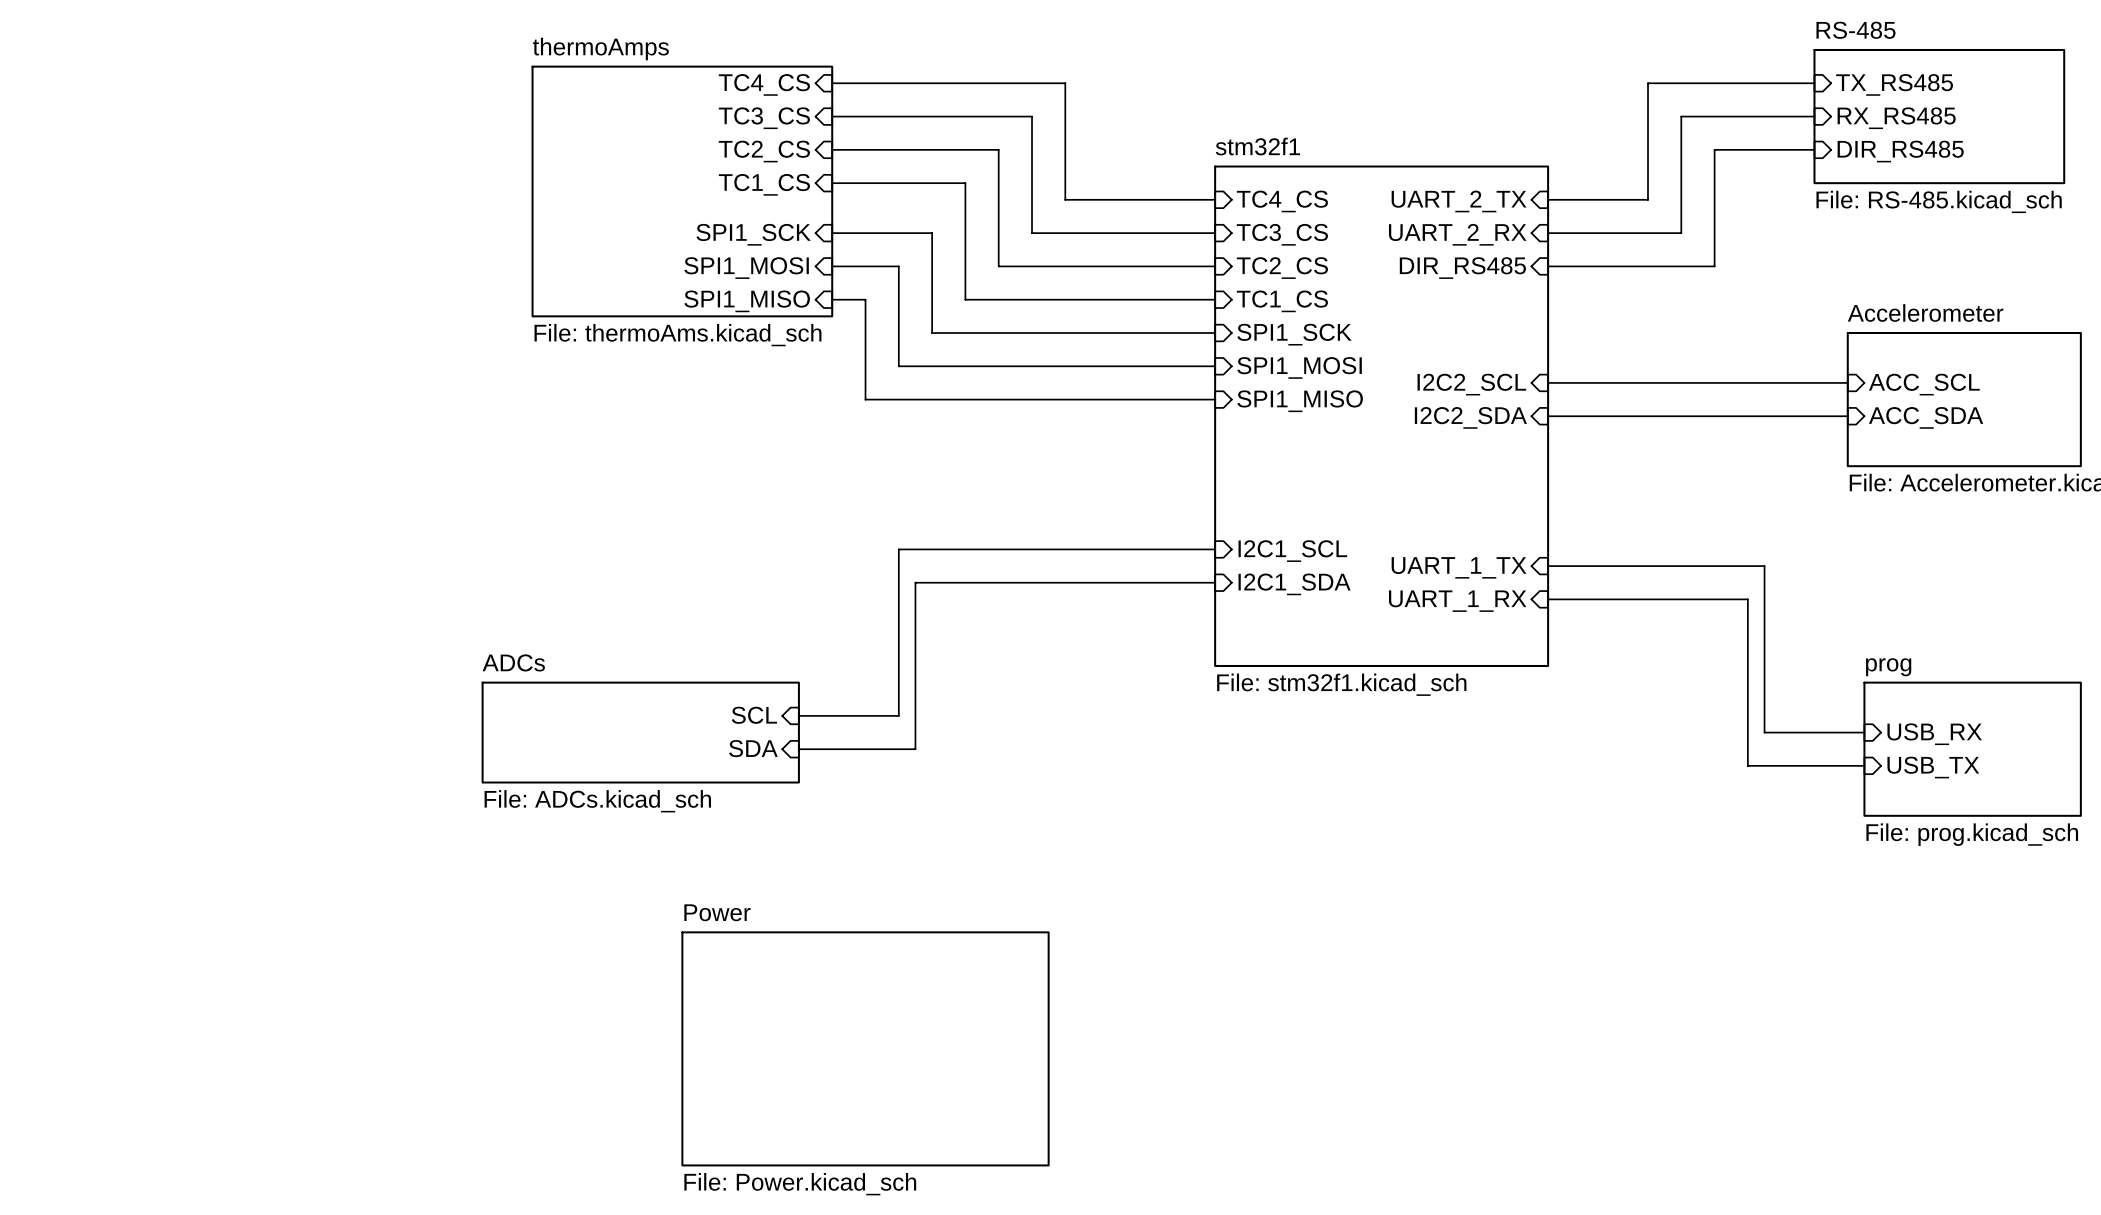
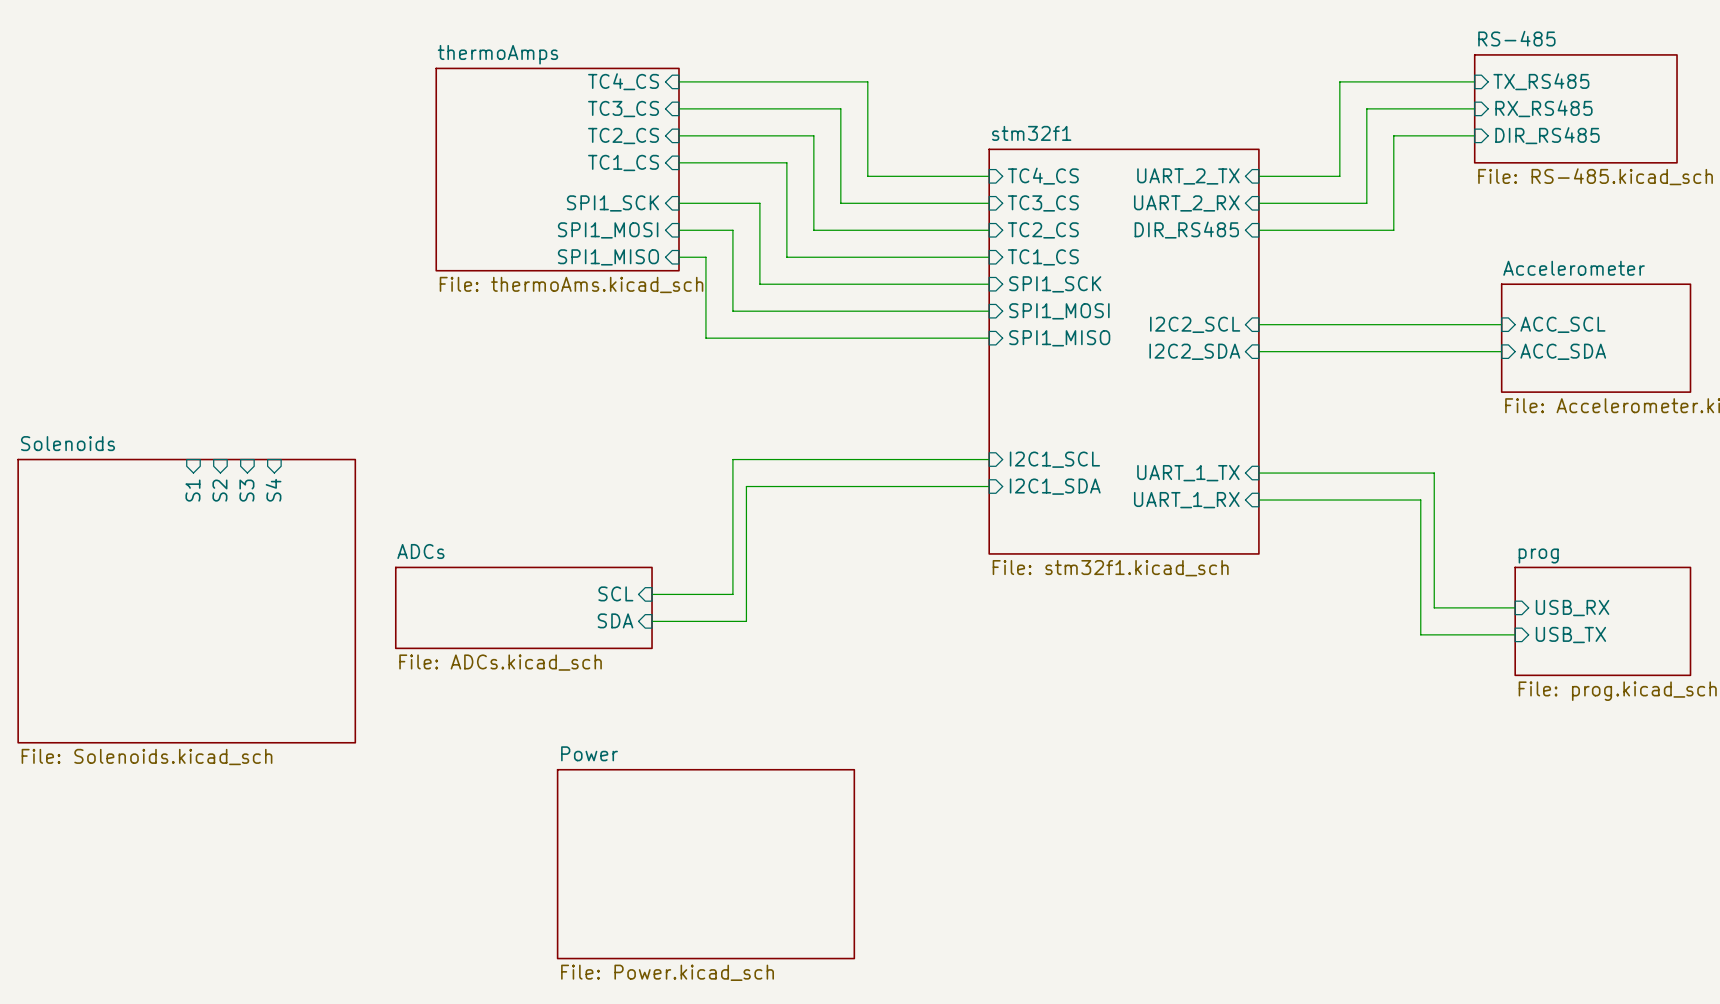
sheet pin: none -> S1 (192, 490)
sheet pin: none -> S2 (219, 490)
sheet pin: none -> S3 (246, 490)
sheet pin: none -> S4 (273, 490)
sheet Solenoids: none -> File: Solenoids.kicad_sch (186, 601)

